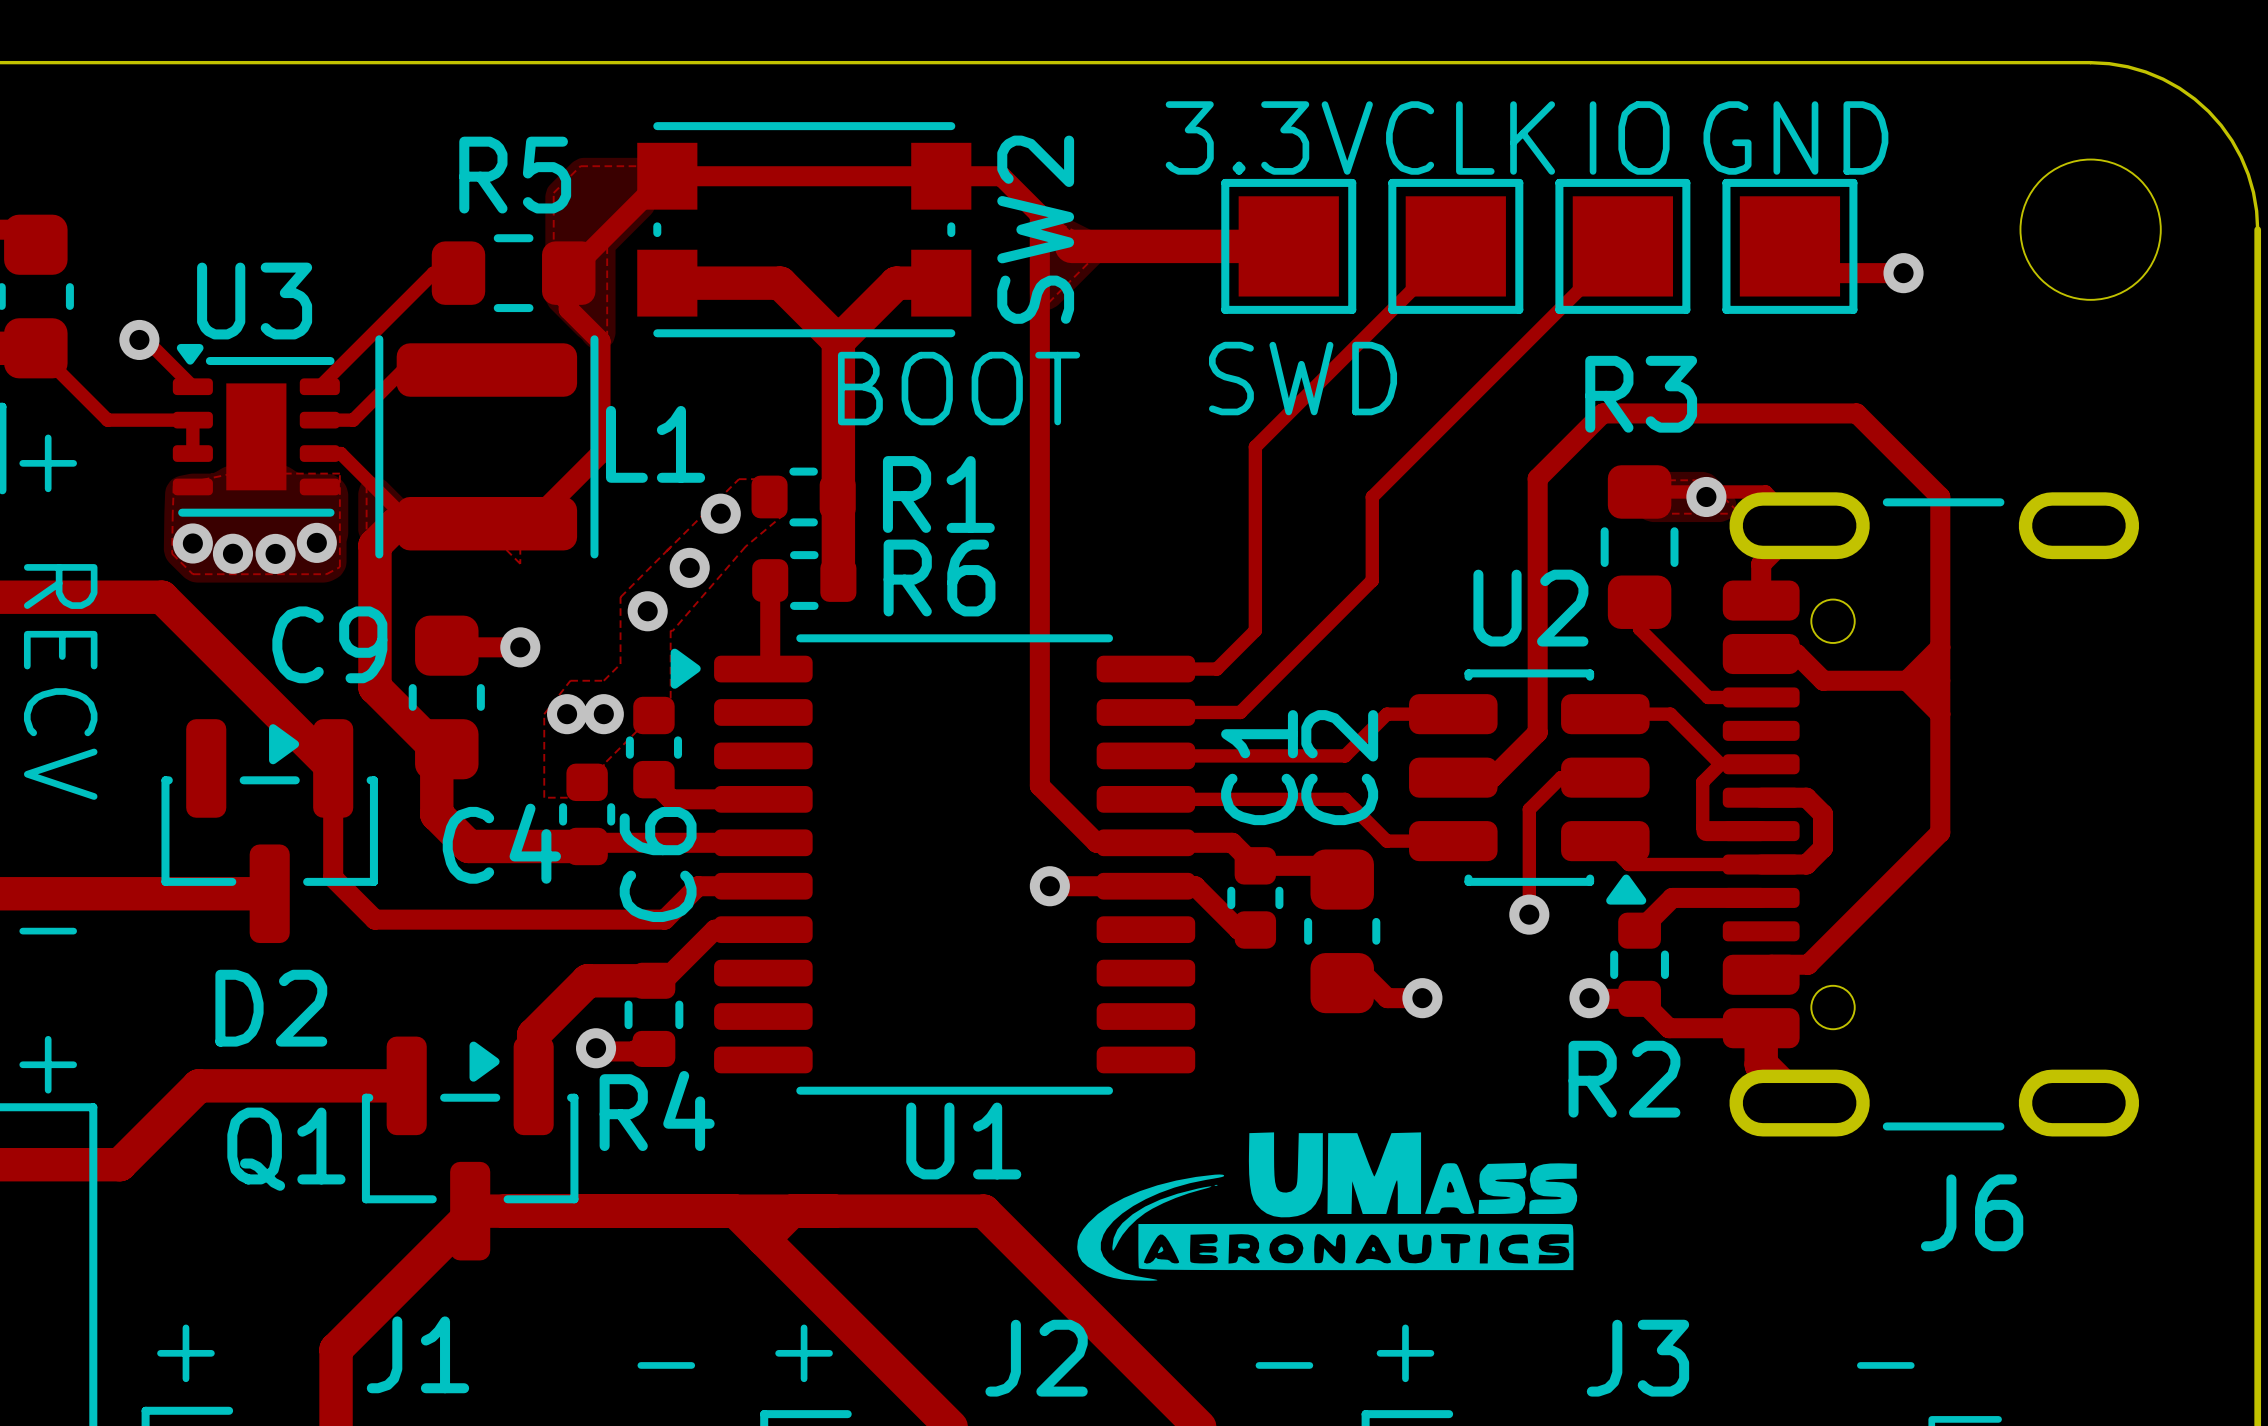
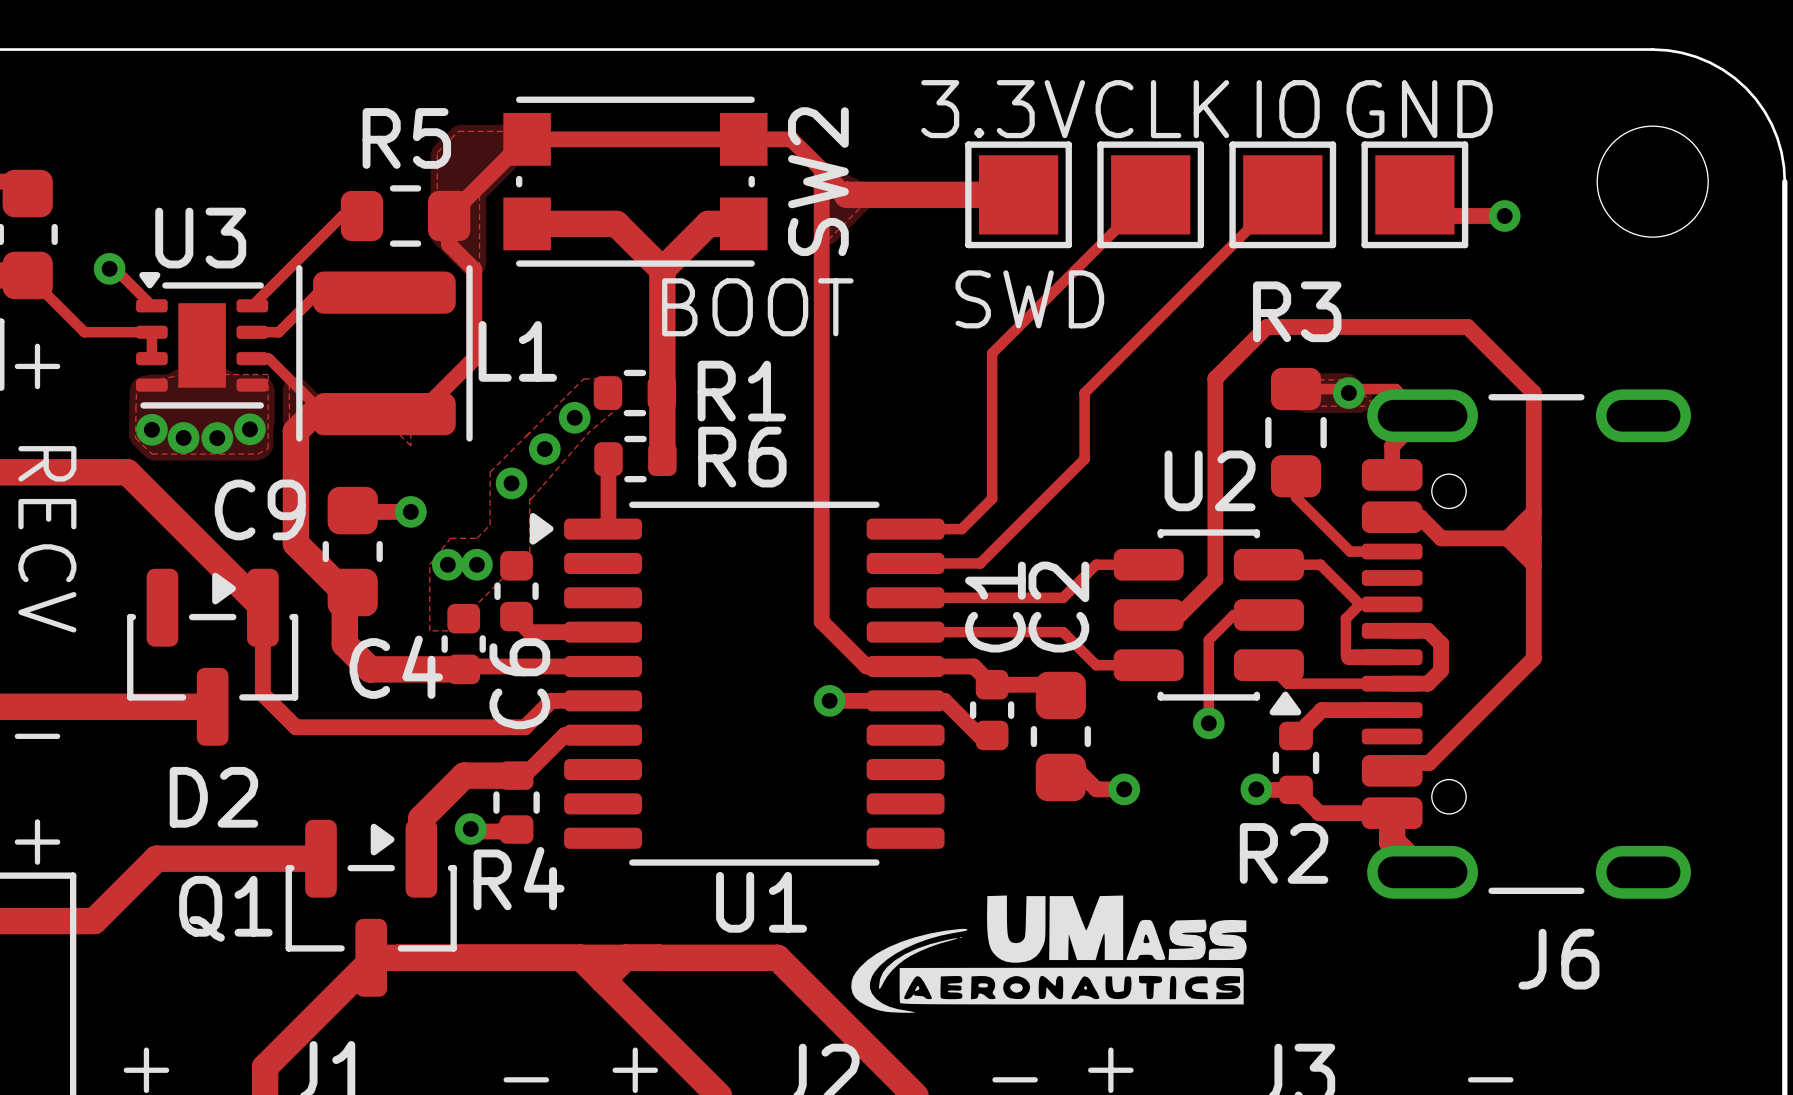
via position: (720, 513) -> (574, 417)

